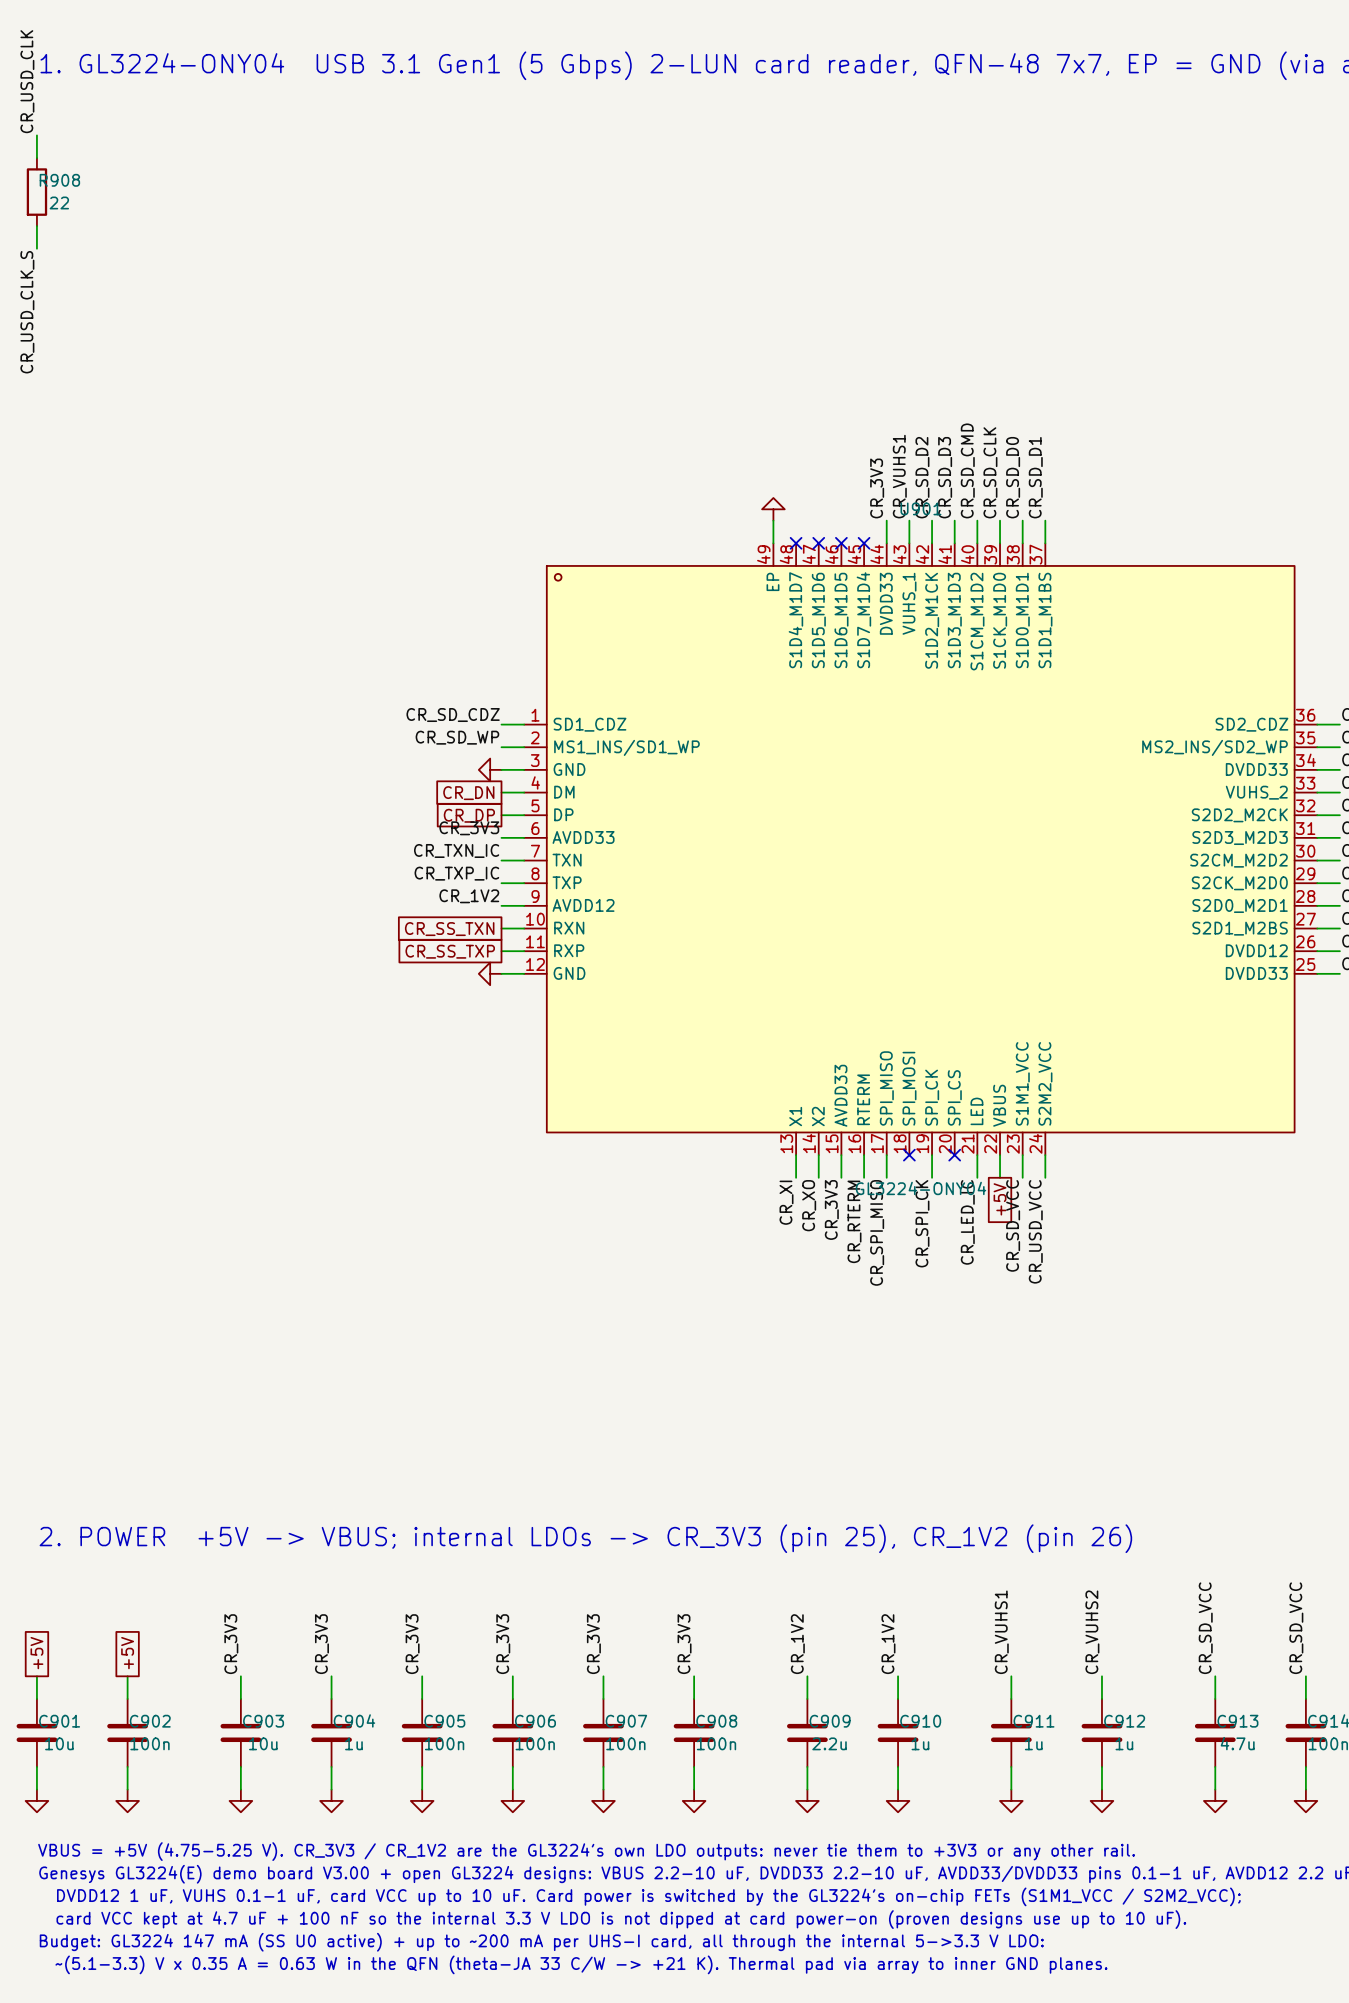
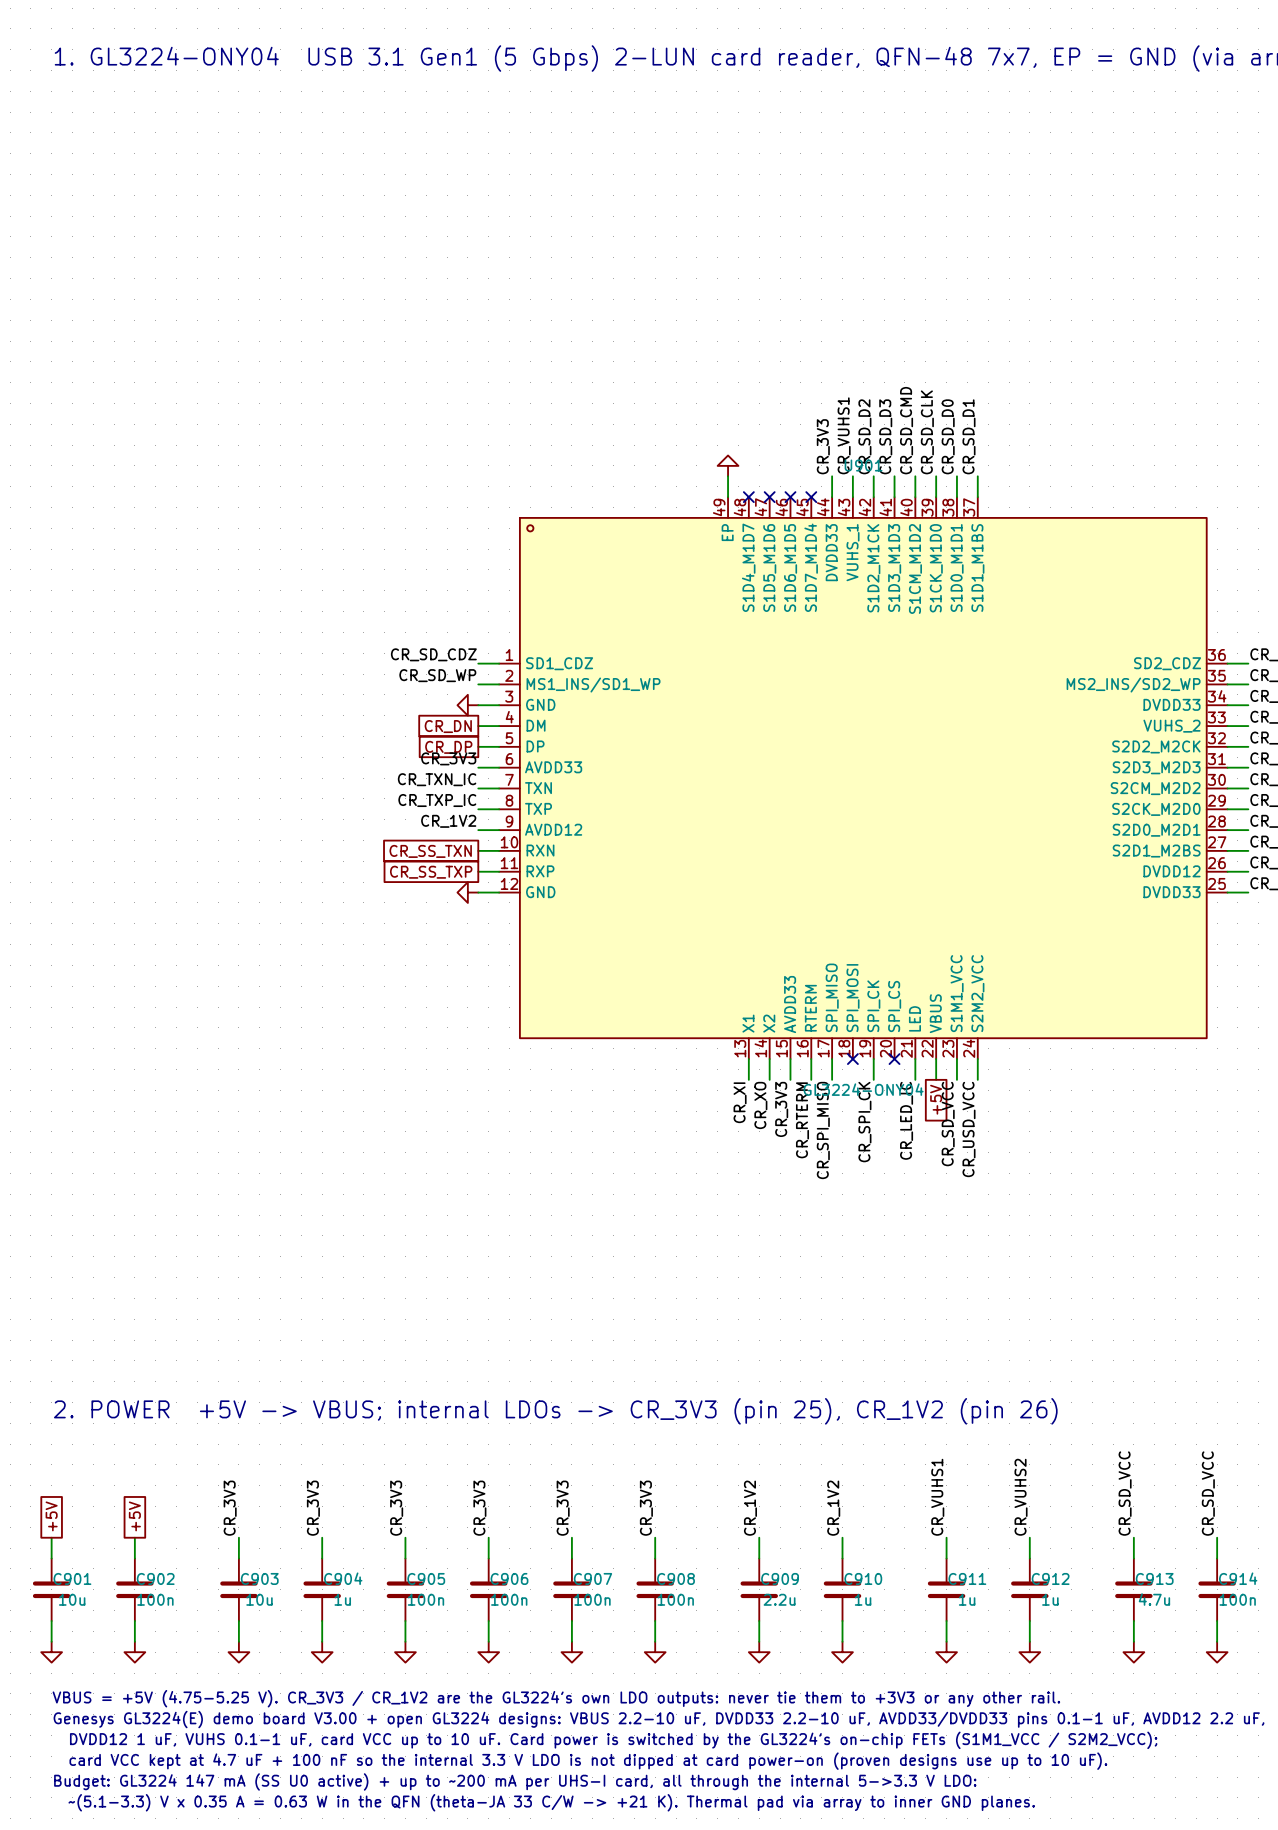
label: CR_USD_CLK (27, 81) -> none
wire: (36, 135) (36, 158) -> none
R908: 22 (36, 192) -> none
wire: (36, 226) (36, 248) -> none
label: CR_USD_CLK_S (27, 312) -> none

